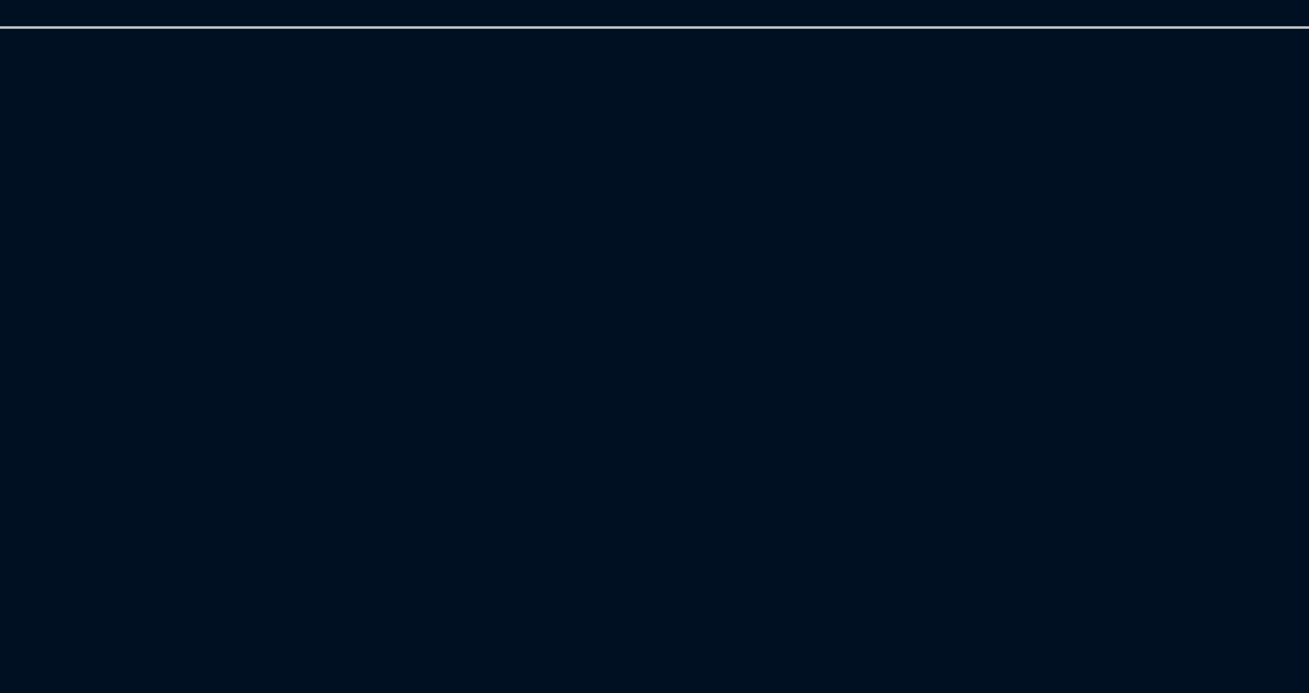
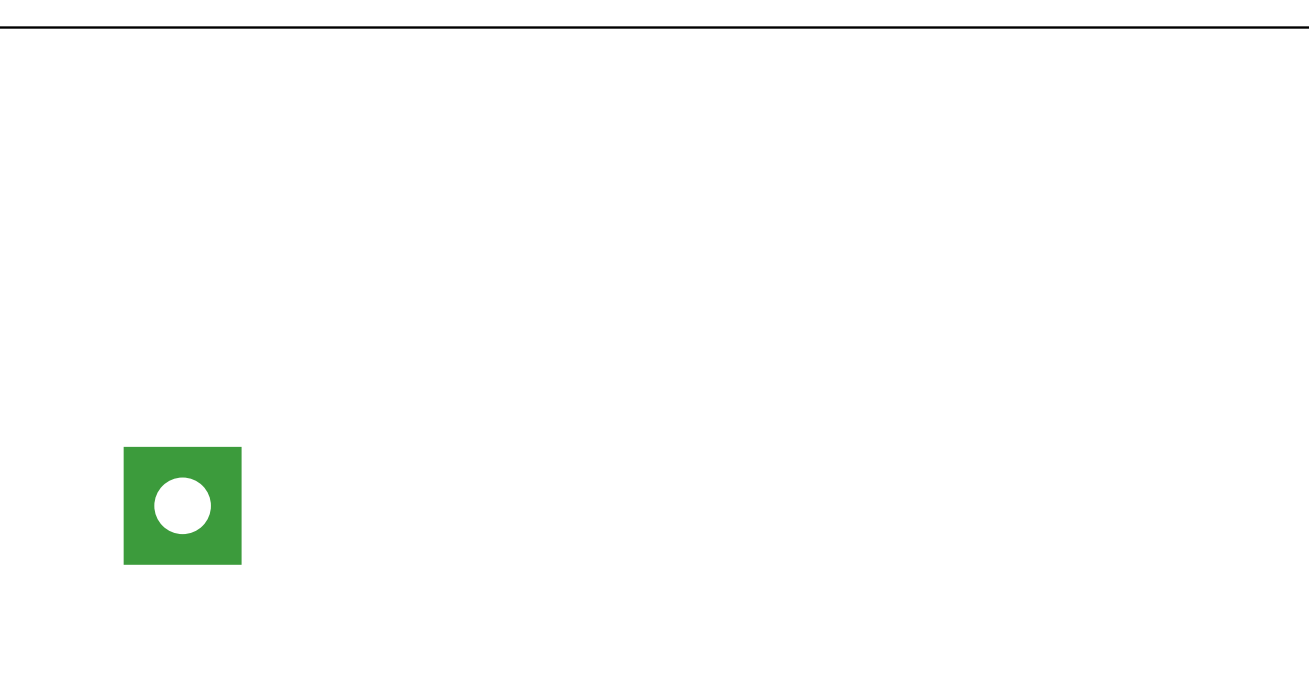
part: none -> (182, 505)

